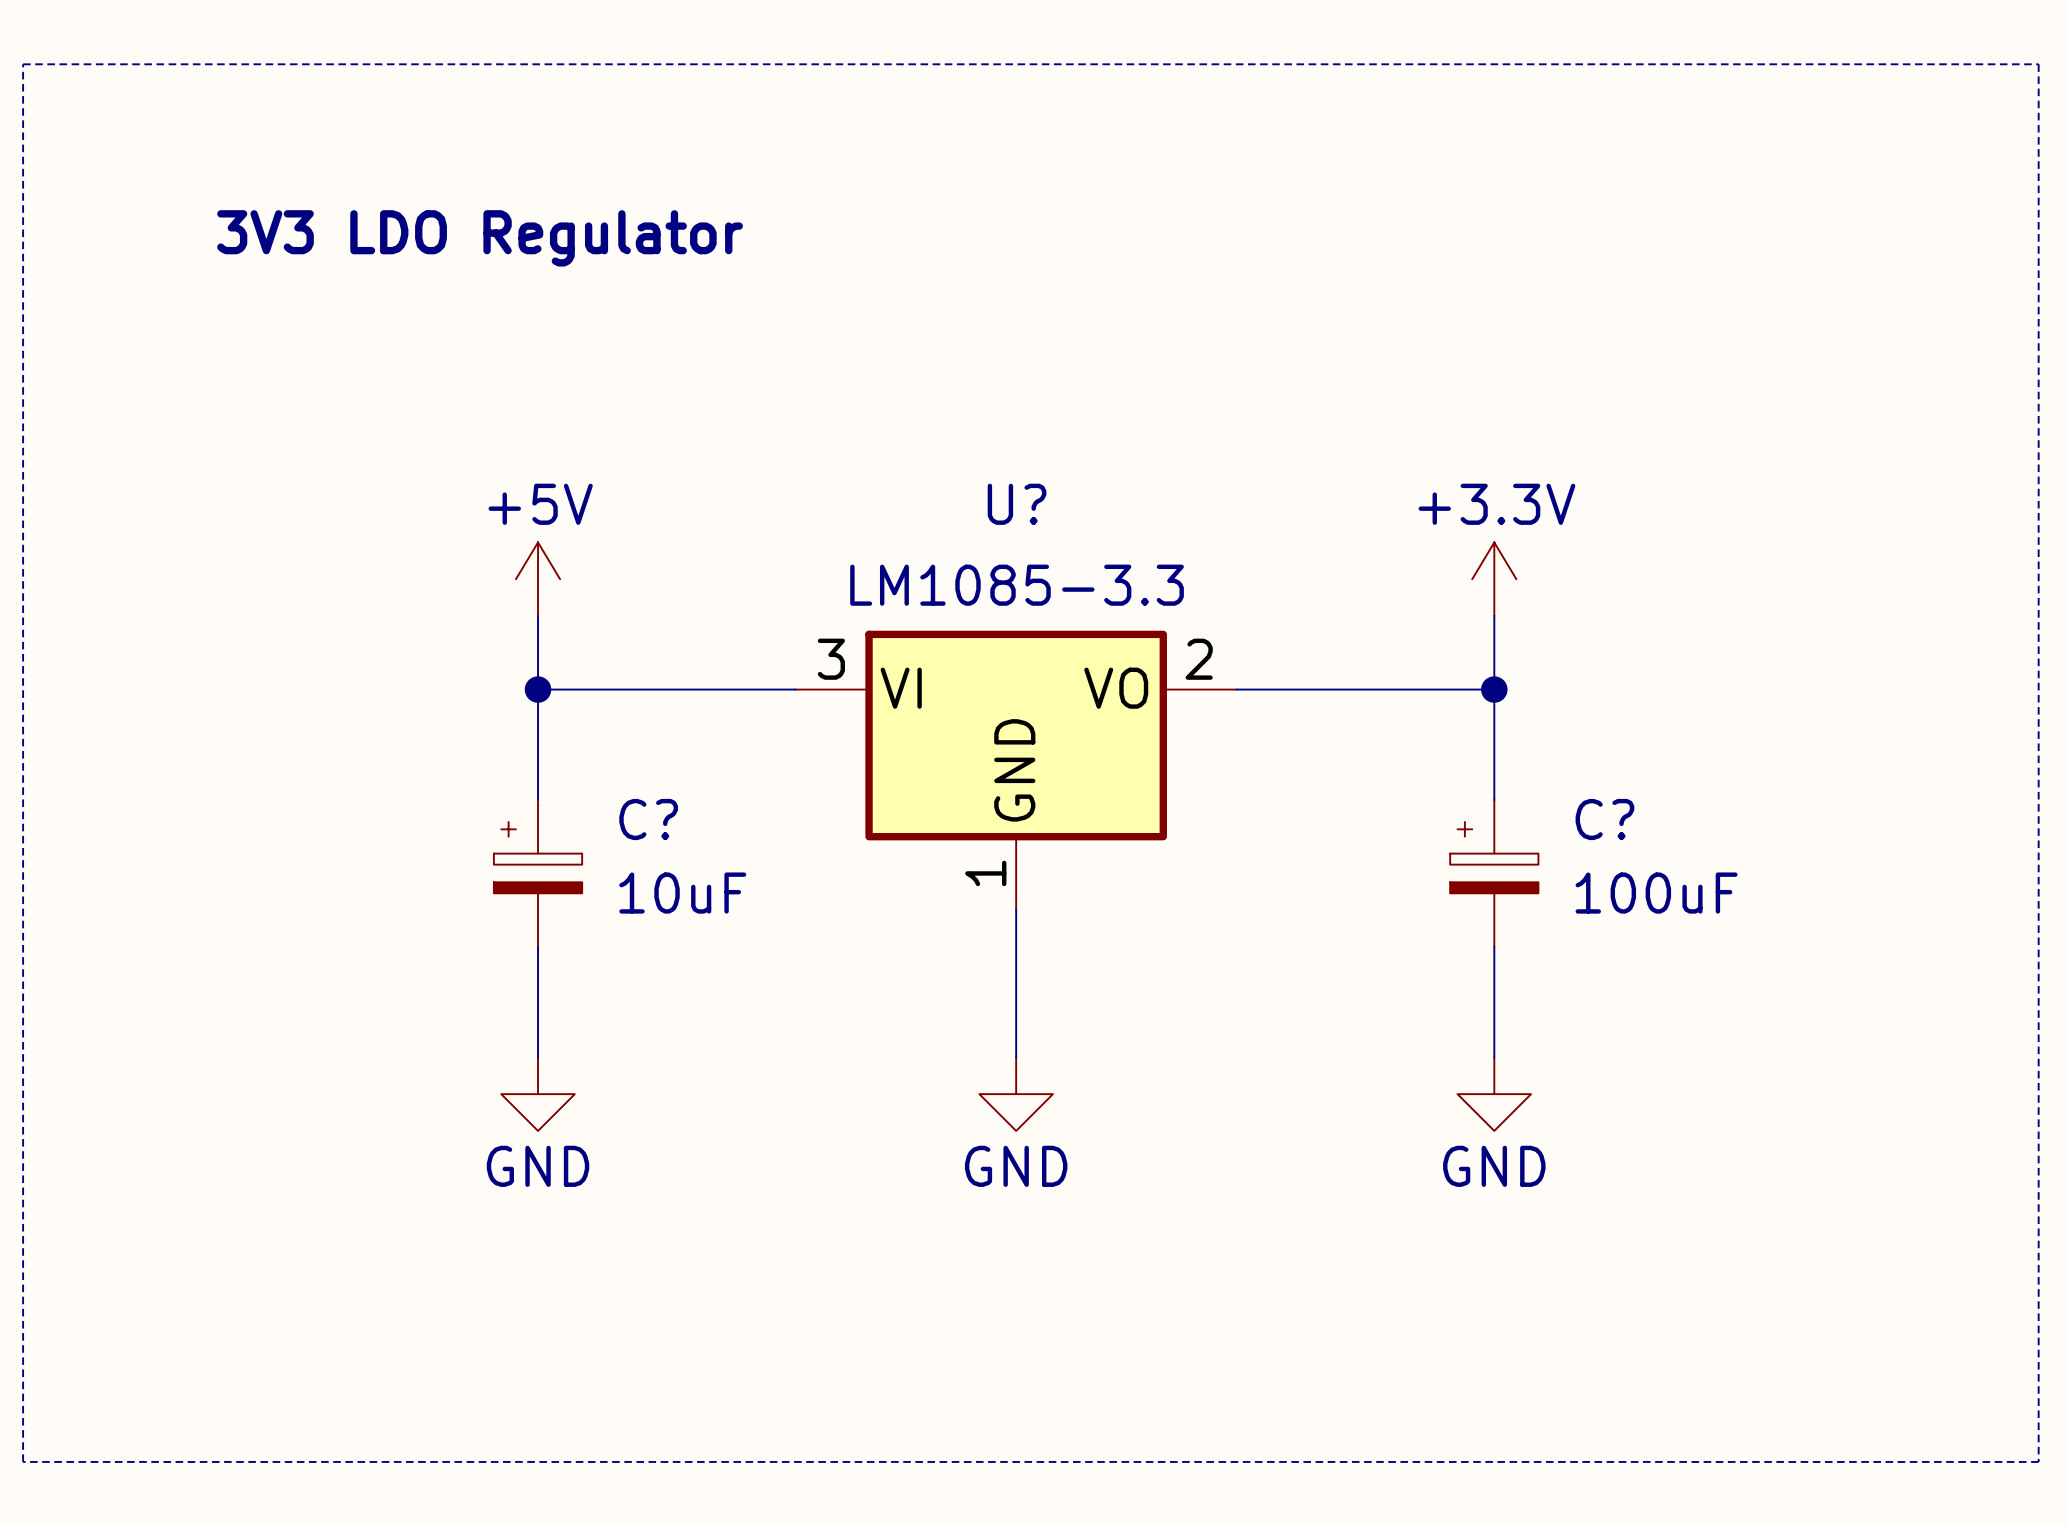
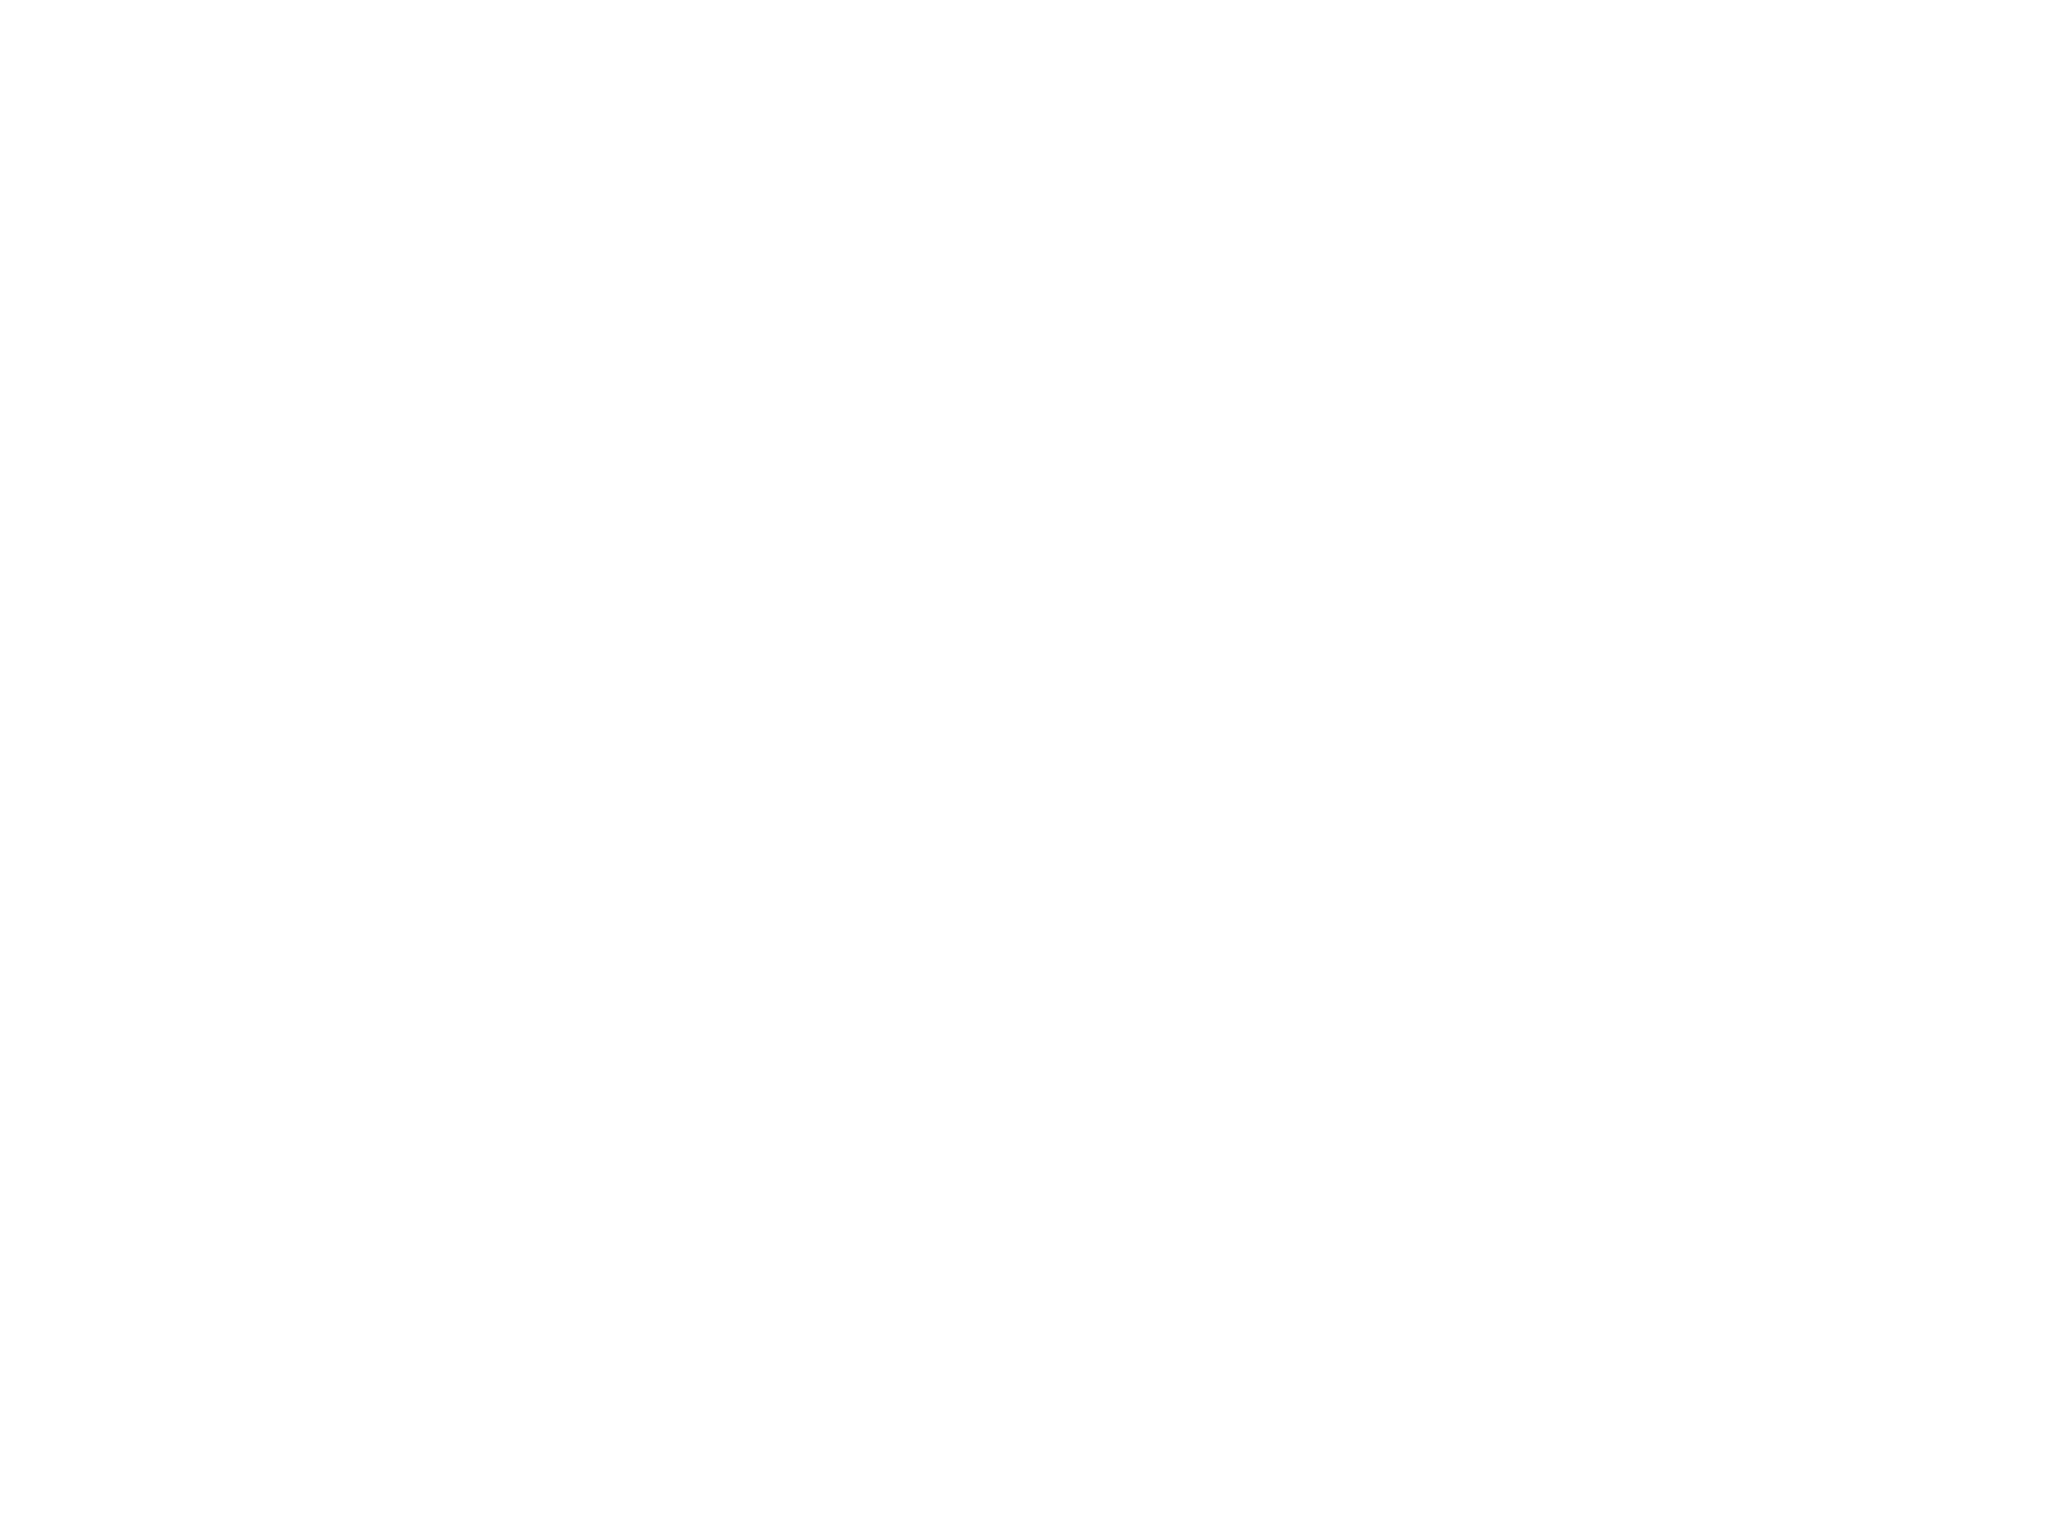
line: (23, 64) (2038, 64) (2038, 1461) (23, 1461) (23, 64) -> none
text: 3V3 LDO Regulator (480, 238) -> none
power symbol: +5V (538, 579) -> none
power symbol: +3.3V (1494, 579) -> none
wire: (538, 616) (538, 799) -> none
wire: (1494, 616) (1494, 799) -> none
wire: (538, 689) (795, 689) -> none
junction: (538, 689) -> none
wire: (1236, 689) (1494, 689) -> none
junction: (1494, 689) -> none
U?: (1016, 770) -> none
C?: 10uF (538, 873) -> none
C?: 100uF (1494, 873) -> none
wire: (1016, 910) (1016, 1057) -> none
wire: (538, 947) (538, 1057) -> none
wire: (1494, 947) (1494, 1057) -> none
power symbol: GND (538, 1094) -> none
power symbol: GND (1016, 1094) -> none
power symbol: GND (1494, 1094) -> none

